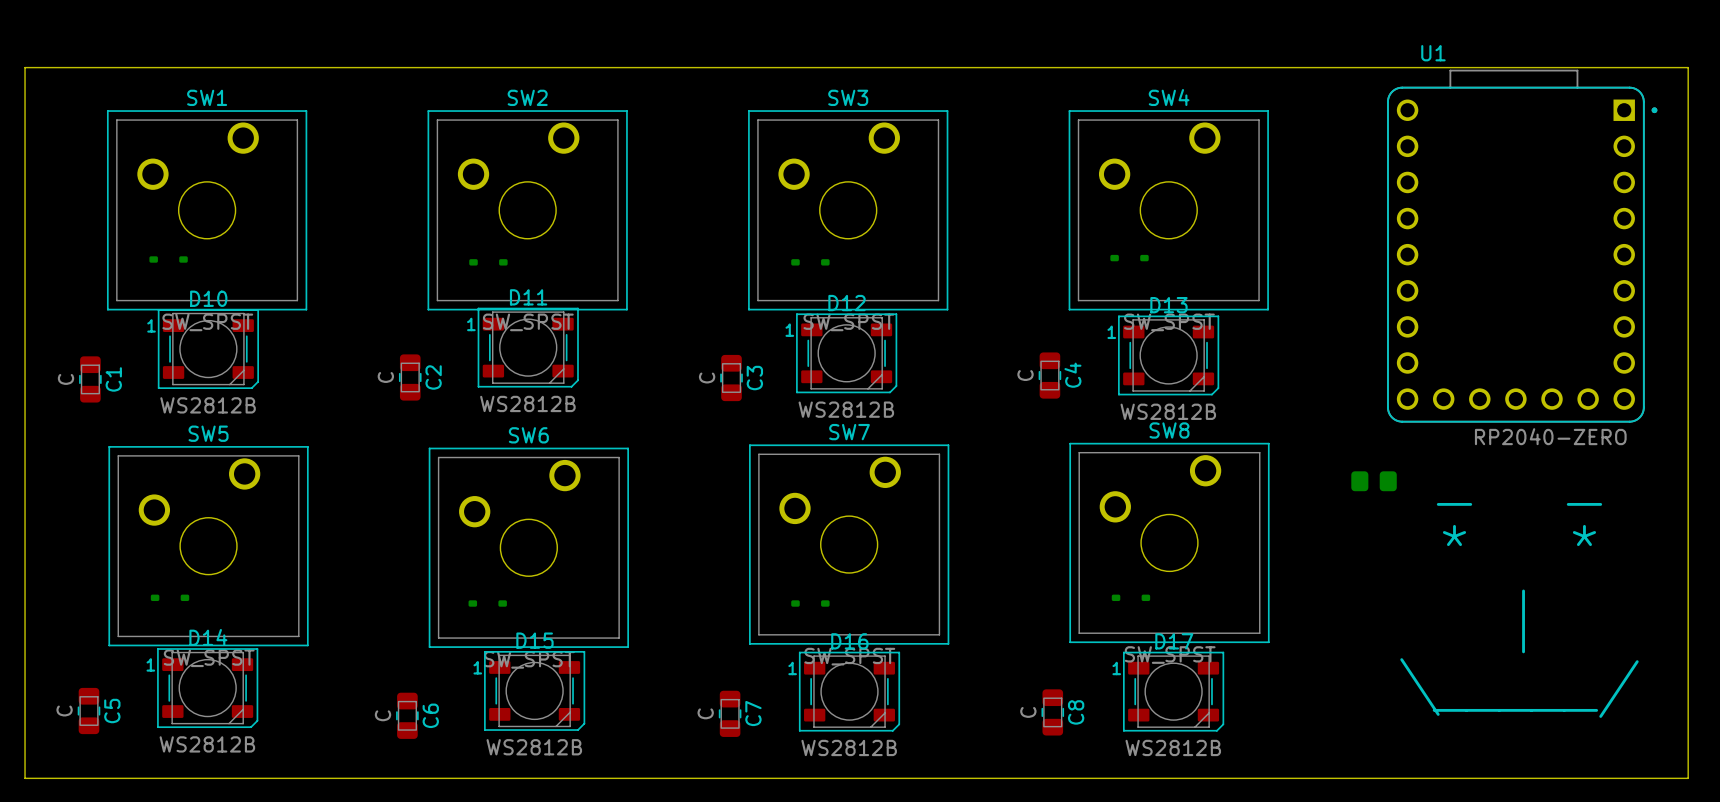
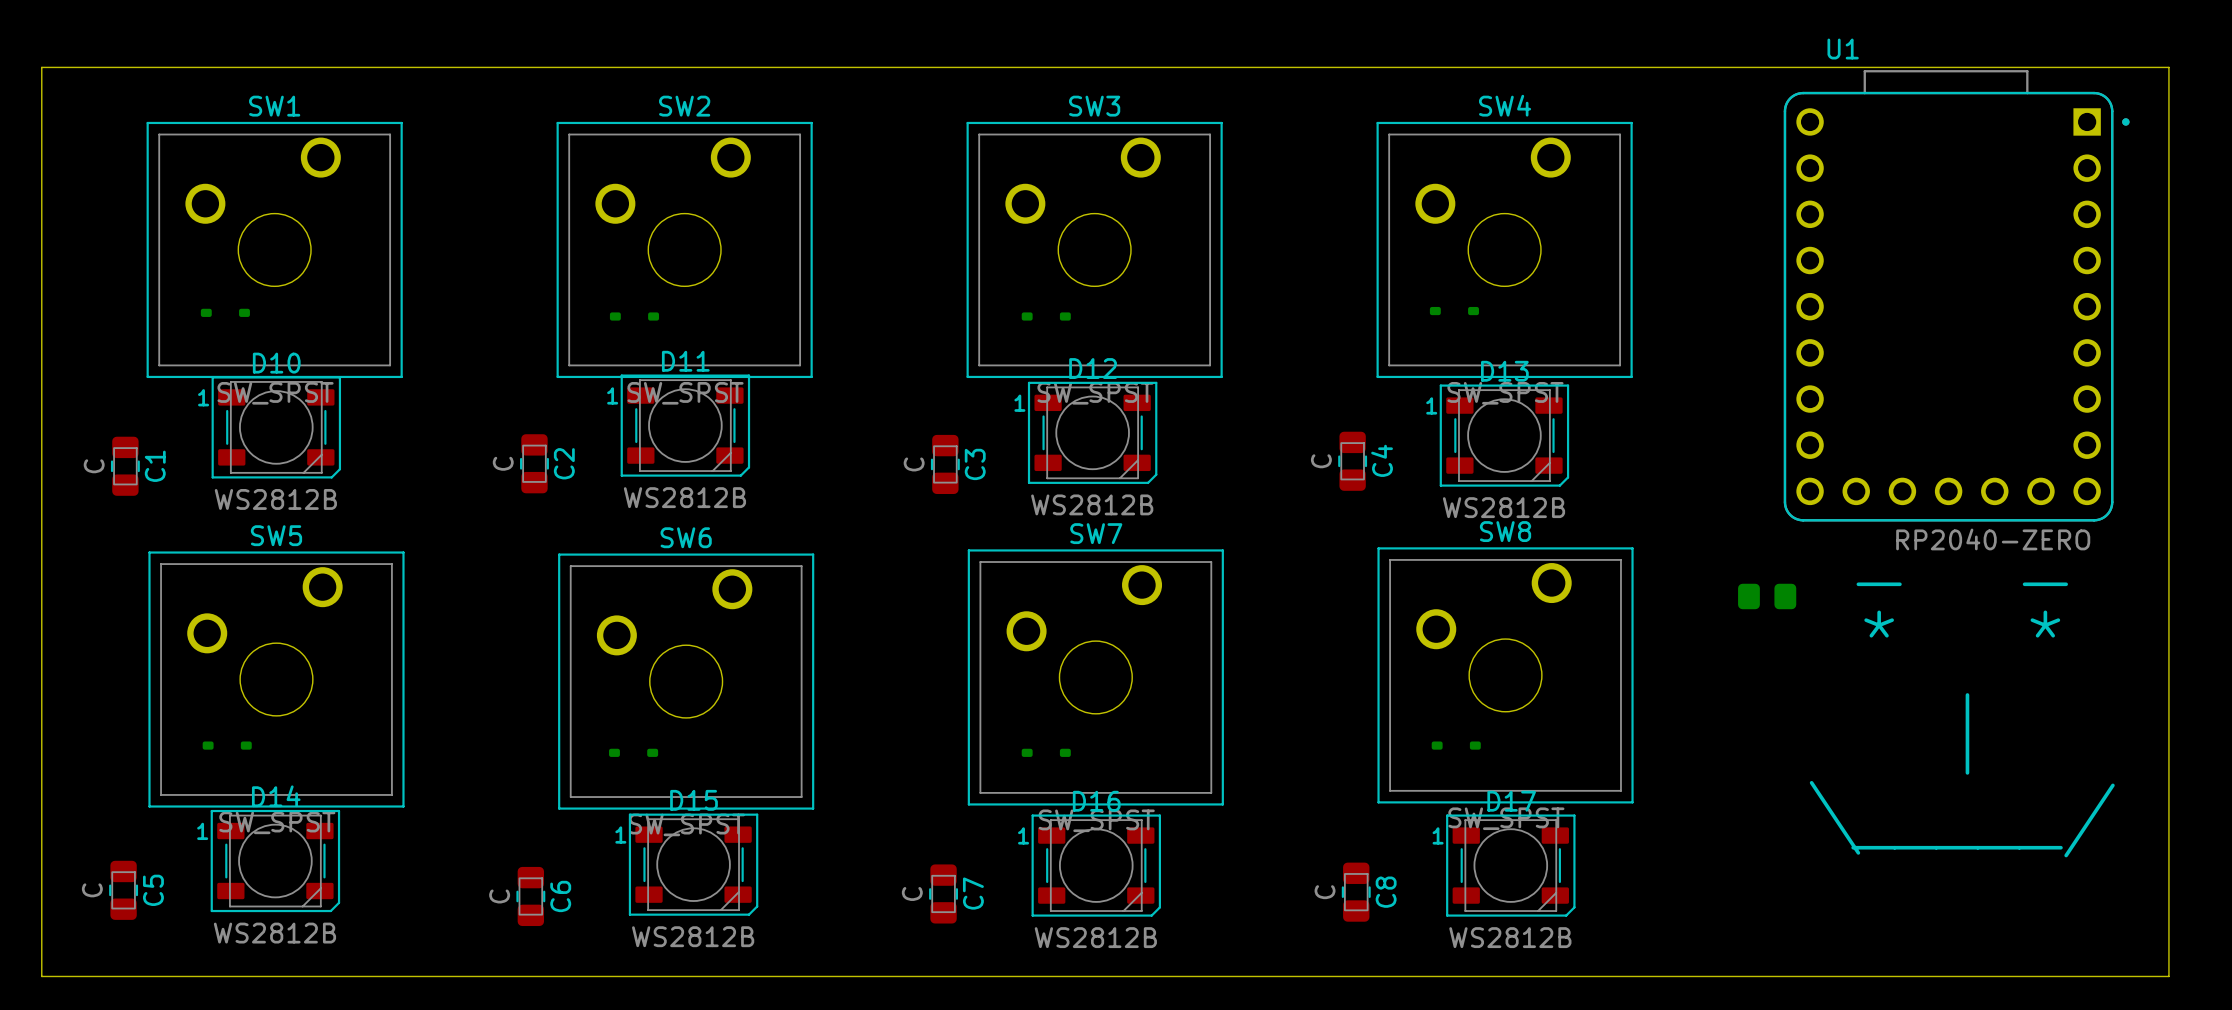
text position: _ _ (1519, 504) -> _ _ (1962, 584)
text position: * * (1519, 535) -> * * (1962, 624)
text position: | (1523, 621) -> | (1967, 733)
text position: \_____/ (1519, 688) -> \_____/ (1962, 819)

